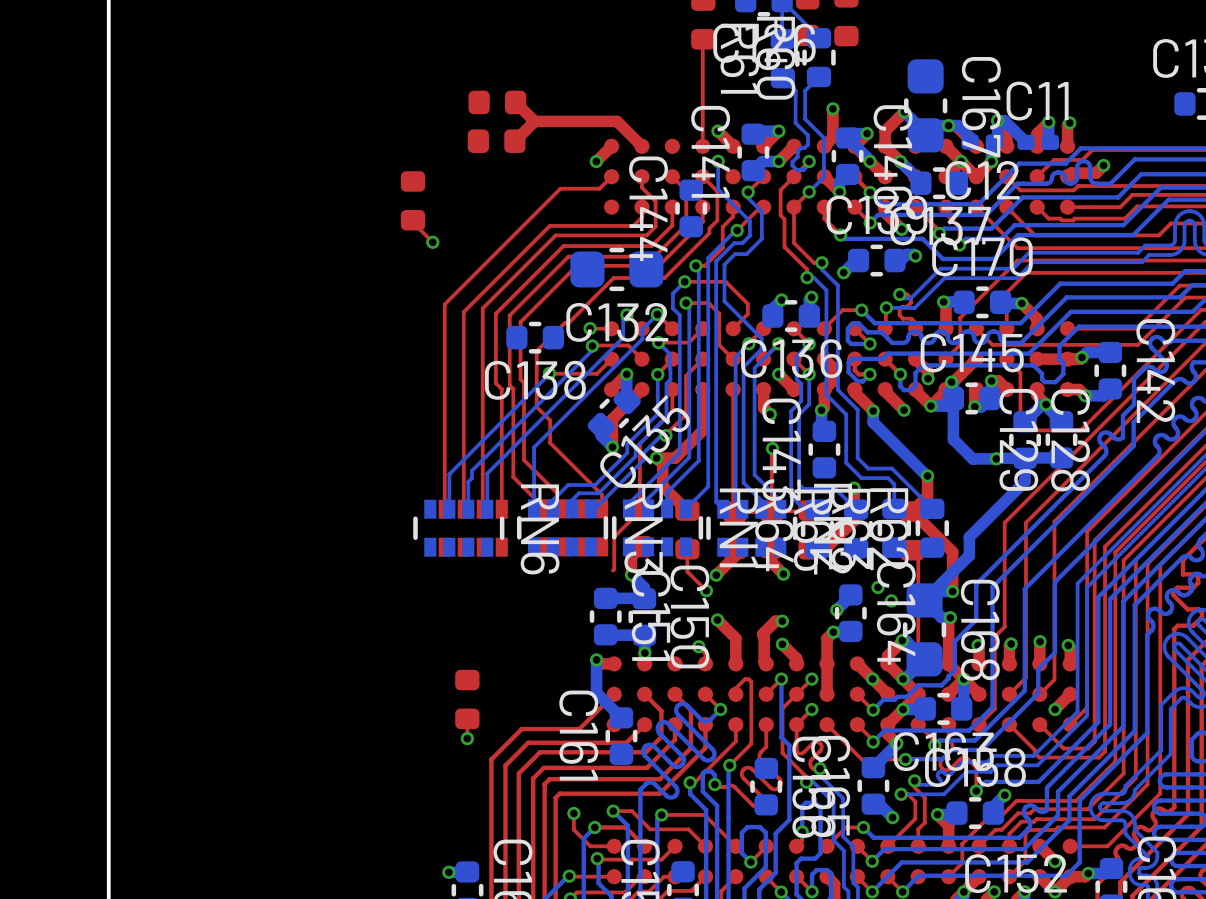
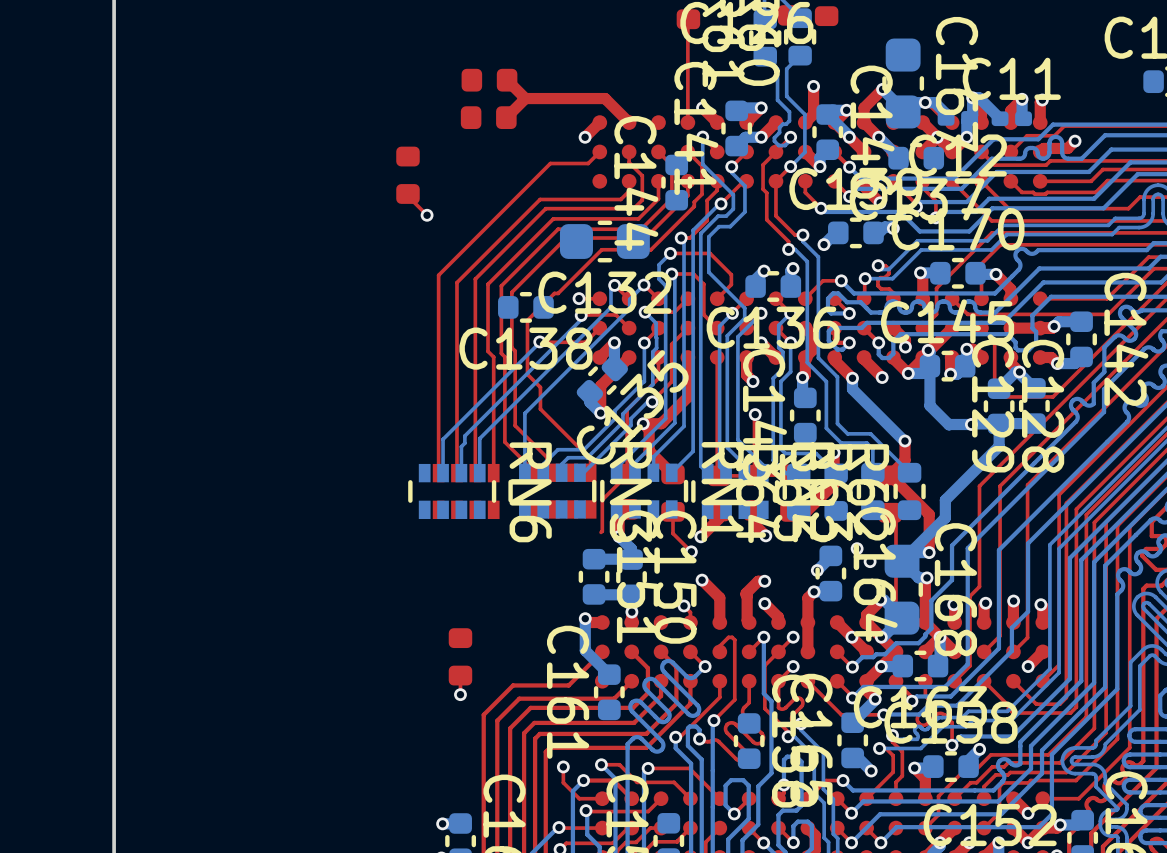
bottom track: (1177, 278) (1172, 283) (1060, 283) (1045, 298) -> (1146, 250) (1038, 250) (1032, 253) (1021, 248) (1015, 254) (1020, 263) (1018, 269)

